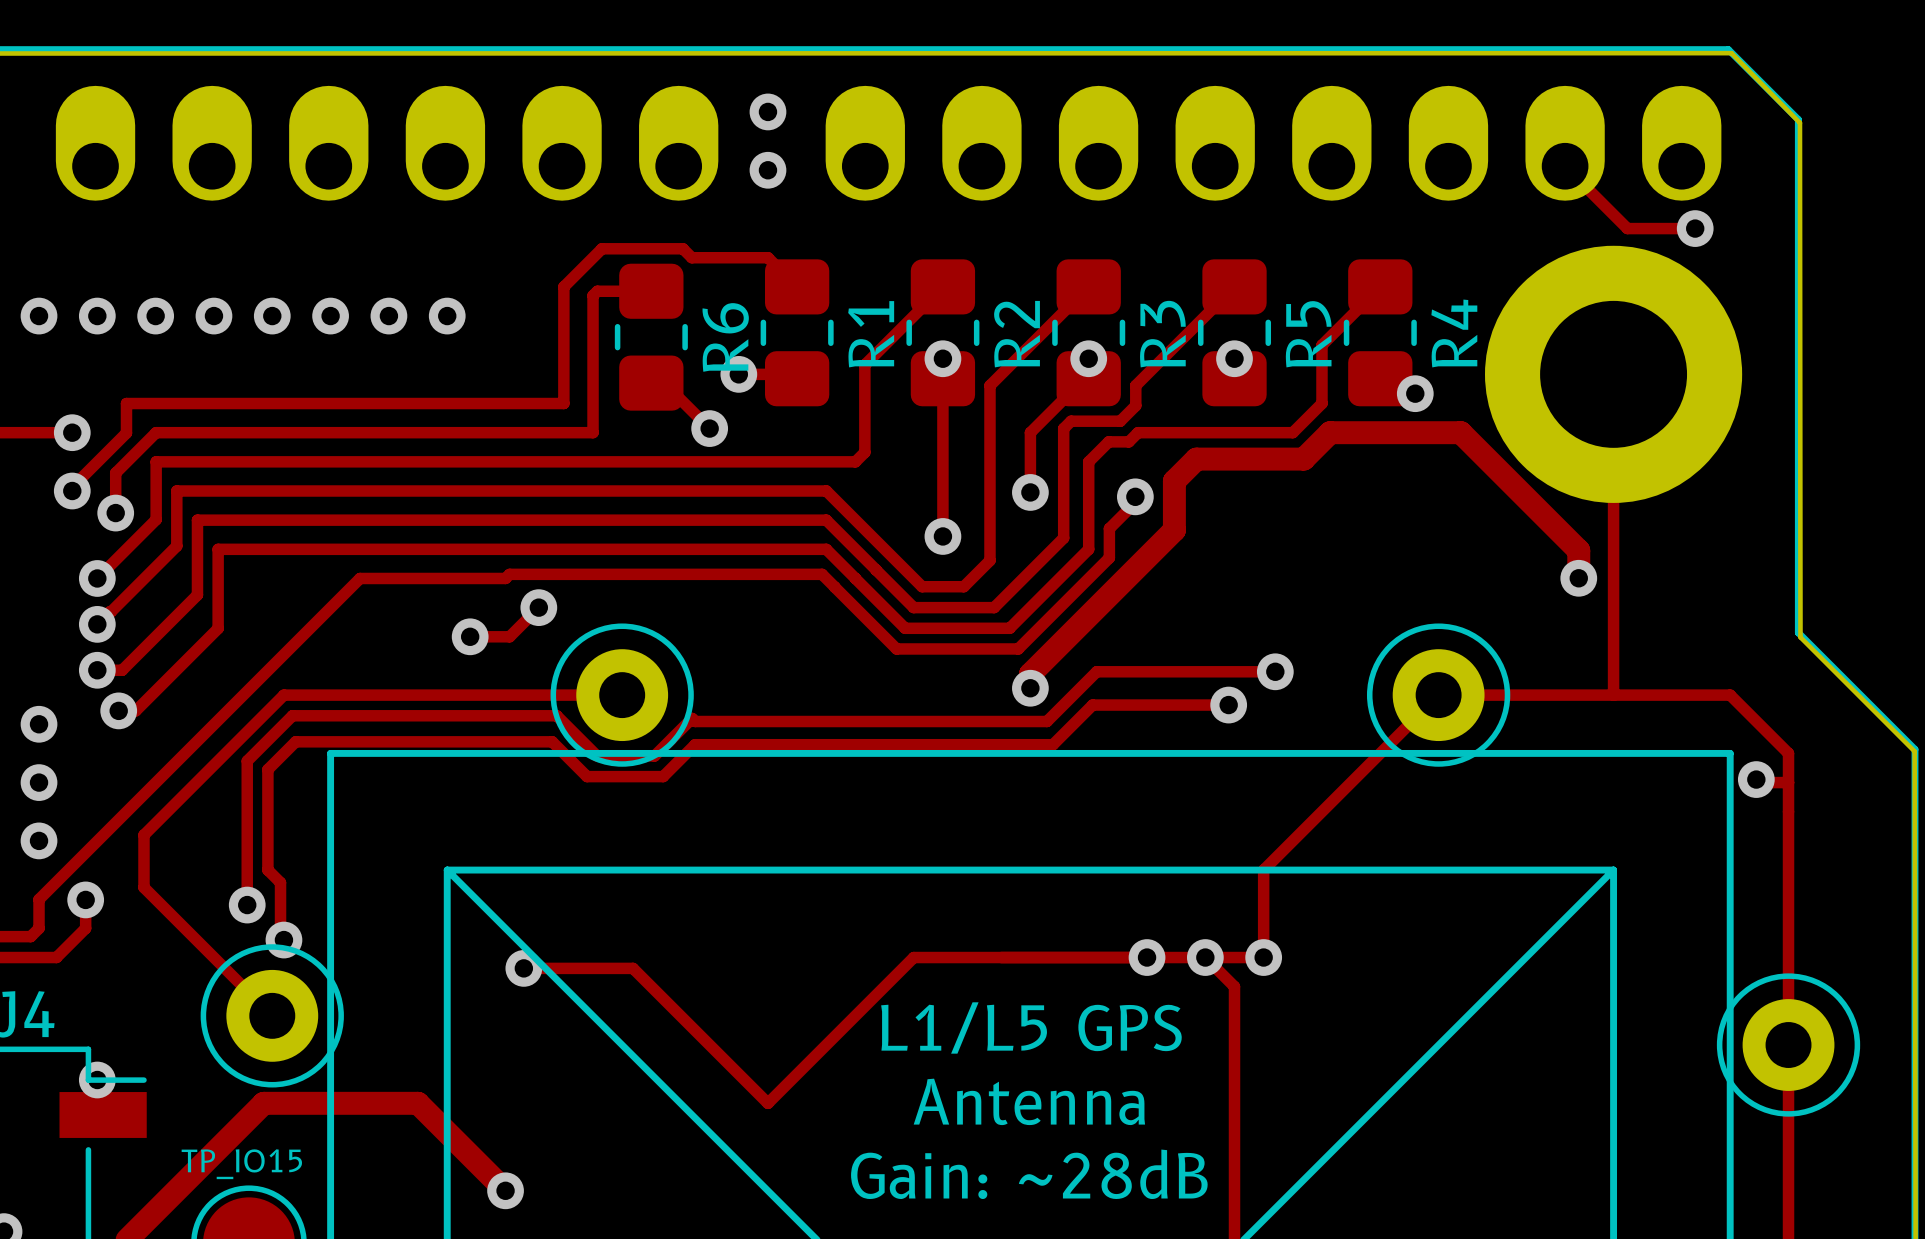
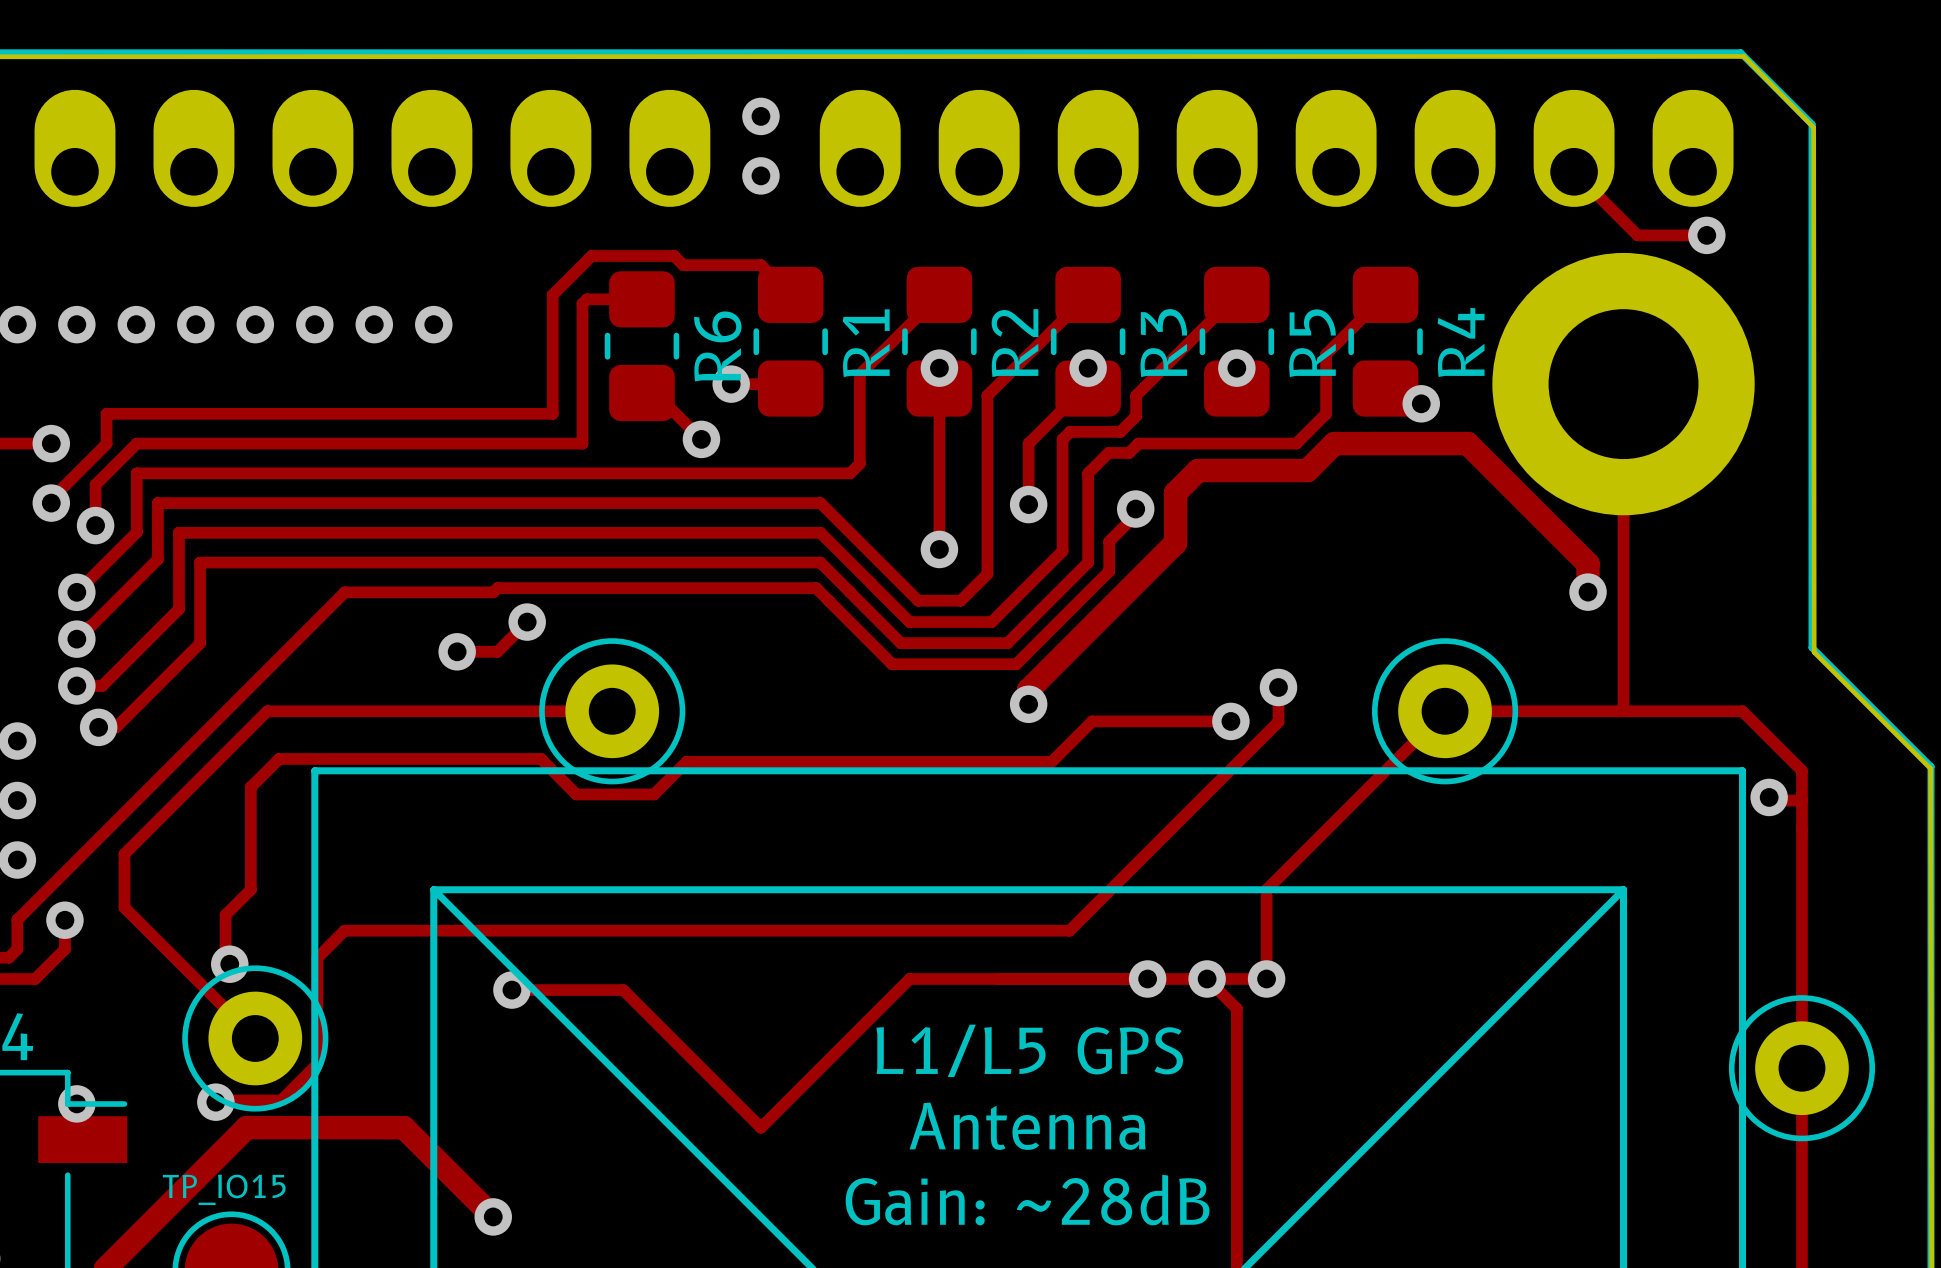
track: (1275, 671) (1096, 671) (1046, 721) (695, 721) (692, 718) (654, 755) (596, 755) (556, 715) (292, 715) (247, 761) (247, 905) -> (1278, 687) (1278, 721) (1069, 930) (344, 930) (317, 957) (317, 1064) (281, 1100) (217, 1100) (215, 1102)
track: (267, 870) (280, 882) (280, 936) (283, 940) -> (250, 889) (225, 915) (225, 960) (229, 964)
via: (247, 905) -> none
via position: (283, 940) -> (229, 964)
via: none -> (215, 1102)

